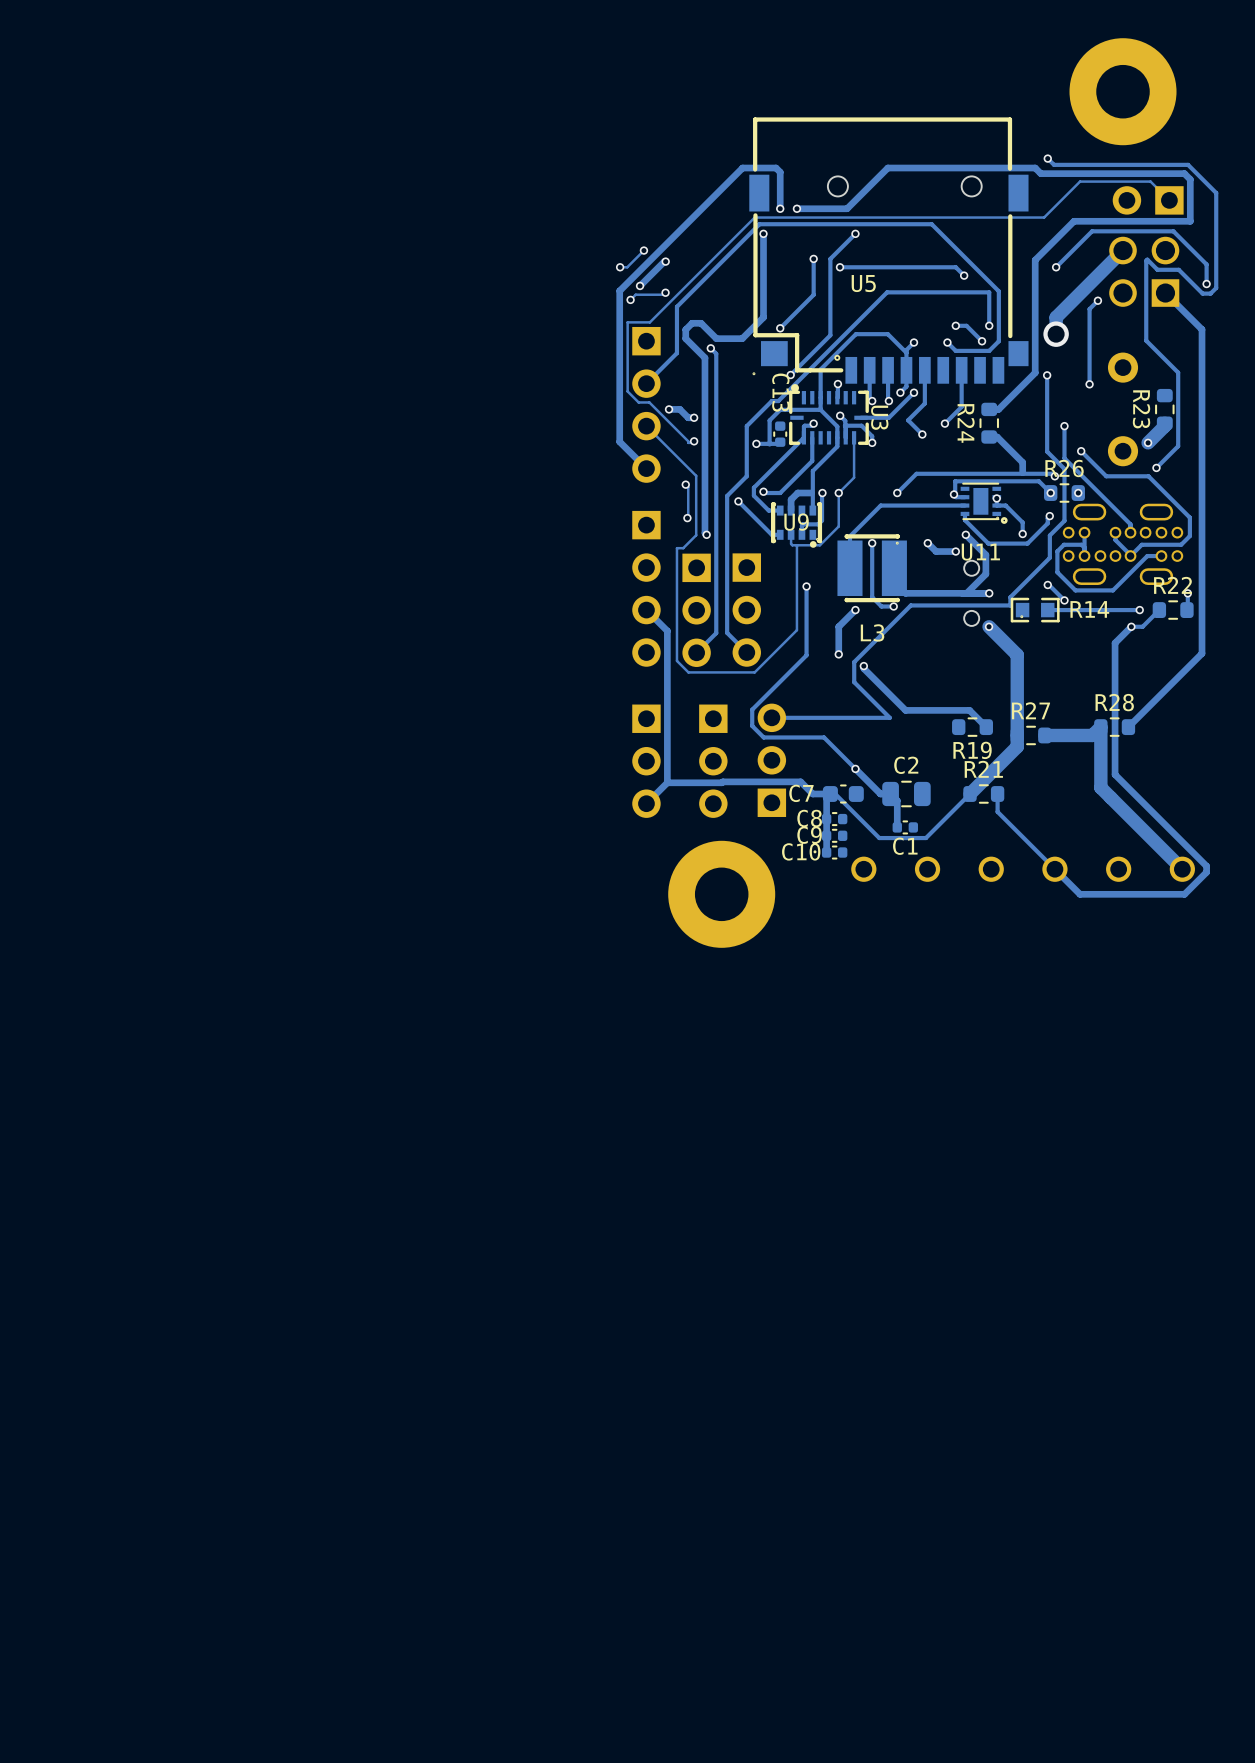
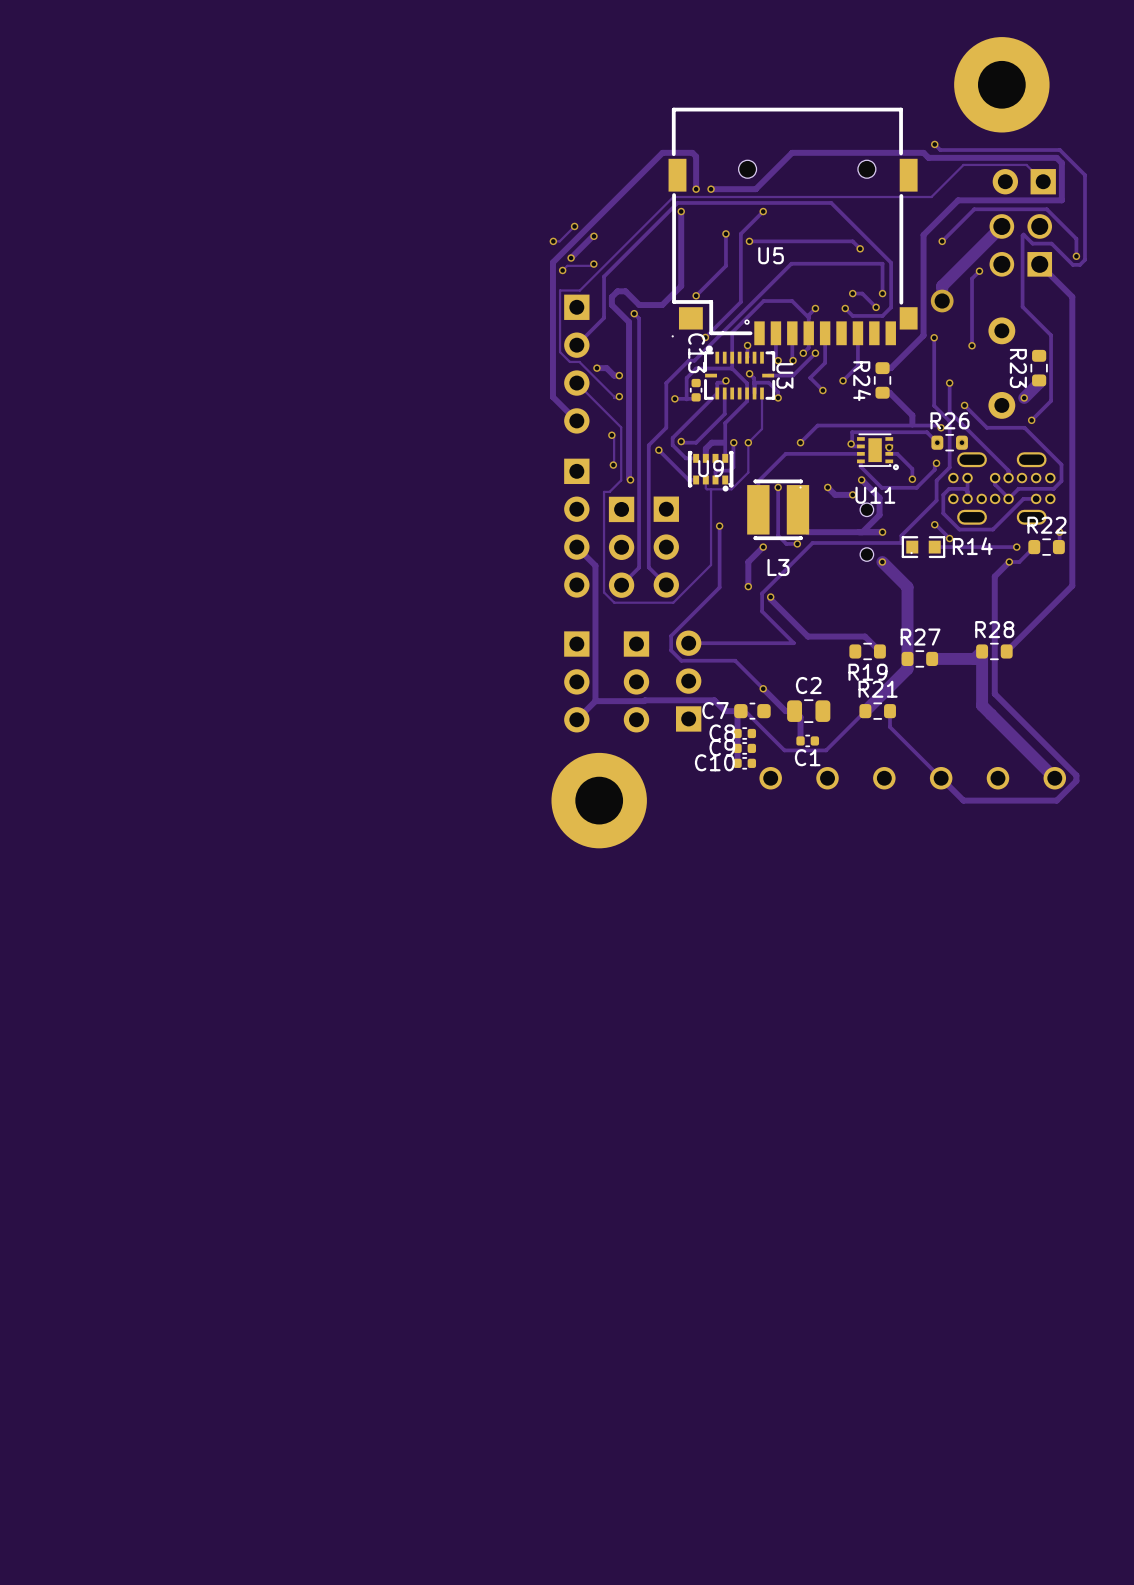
part position: (721, 894) -> (599, 800)

